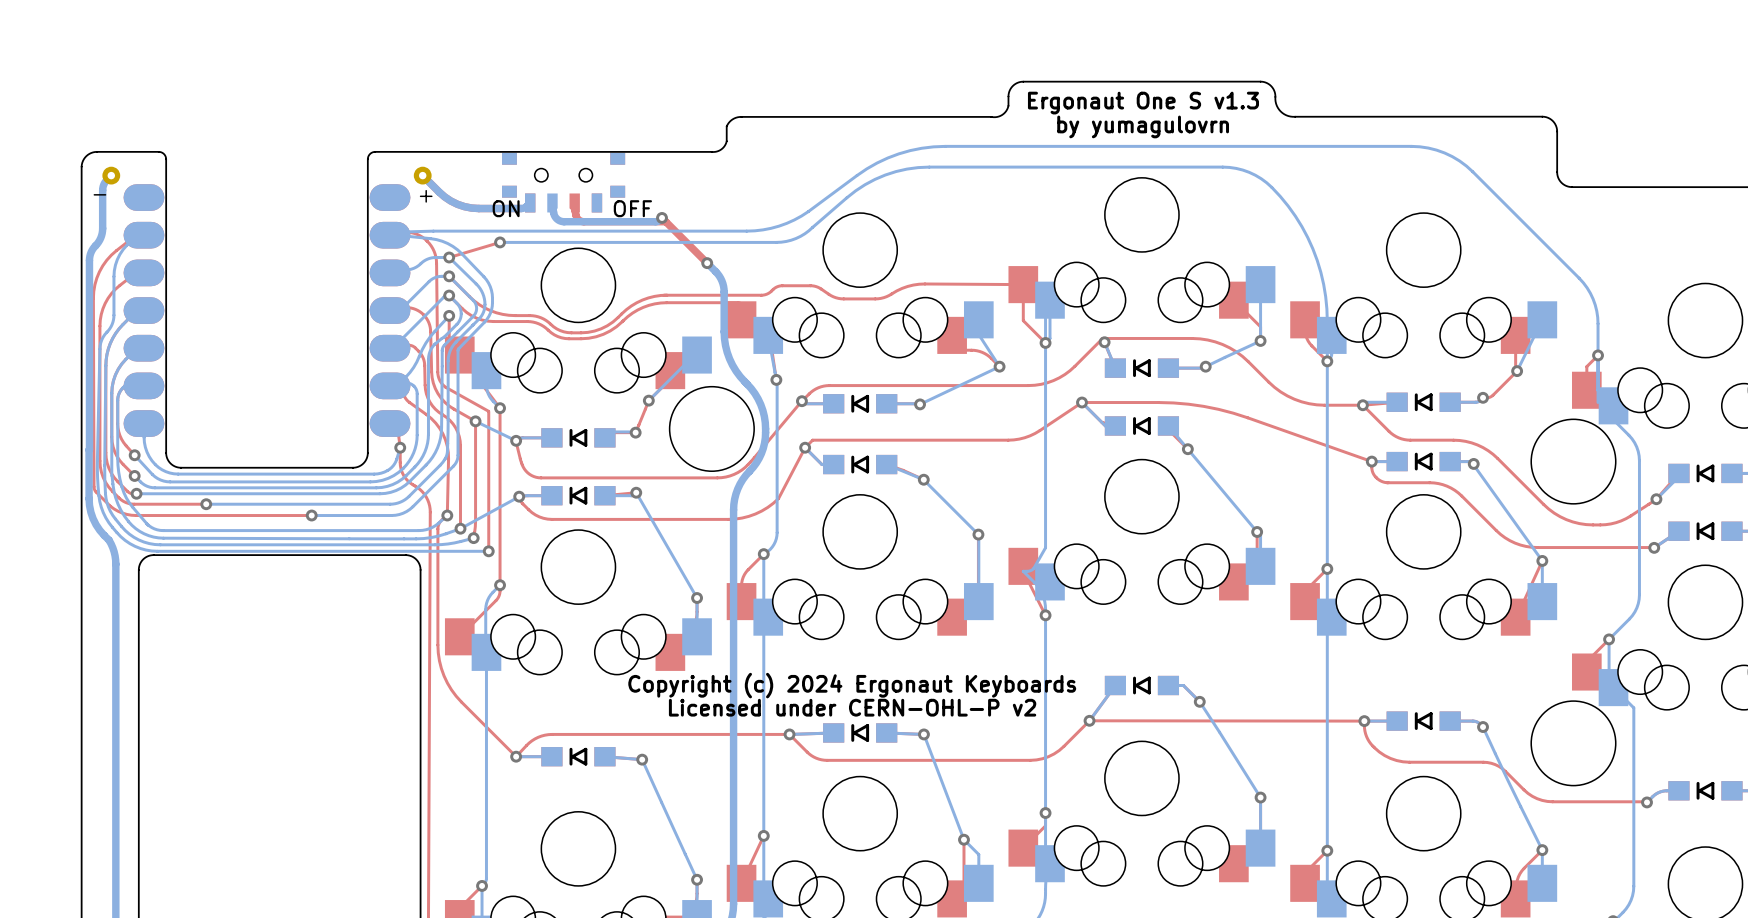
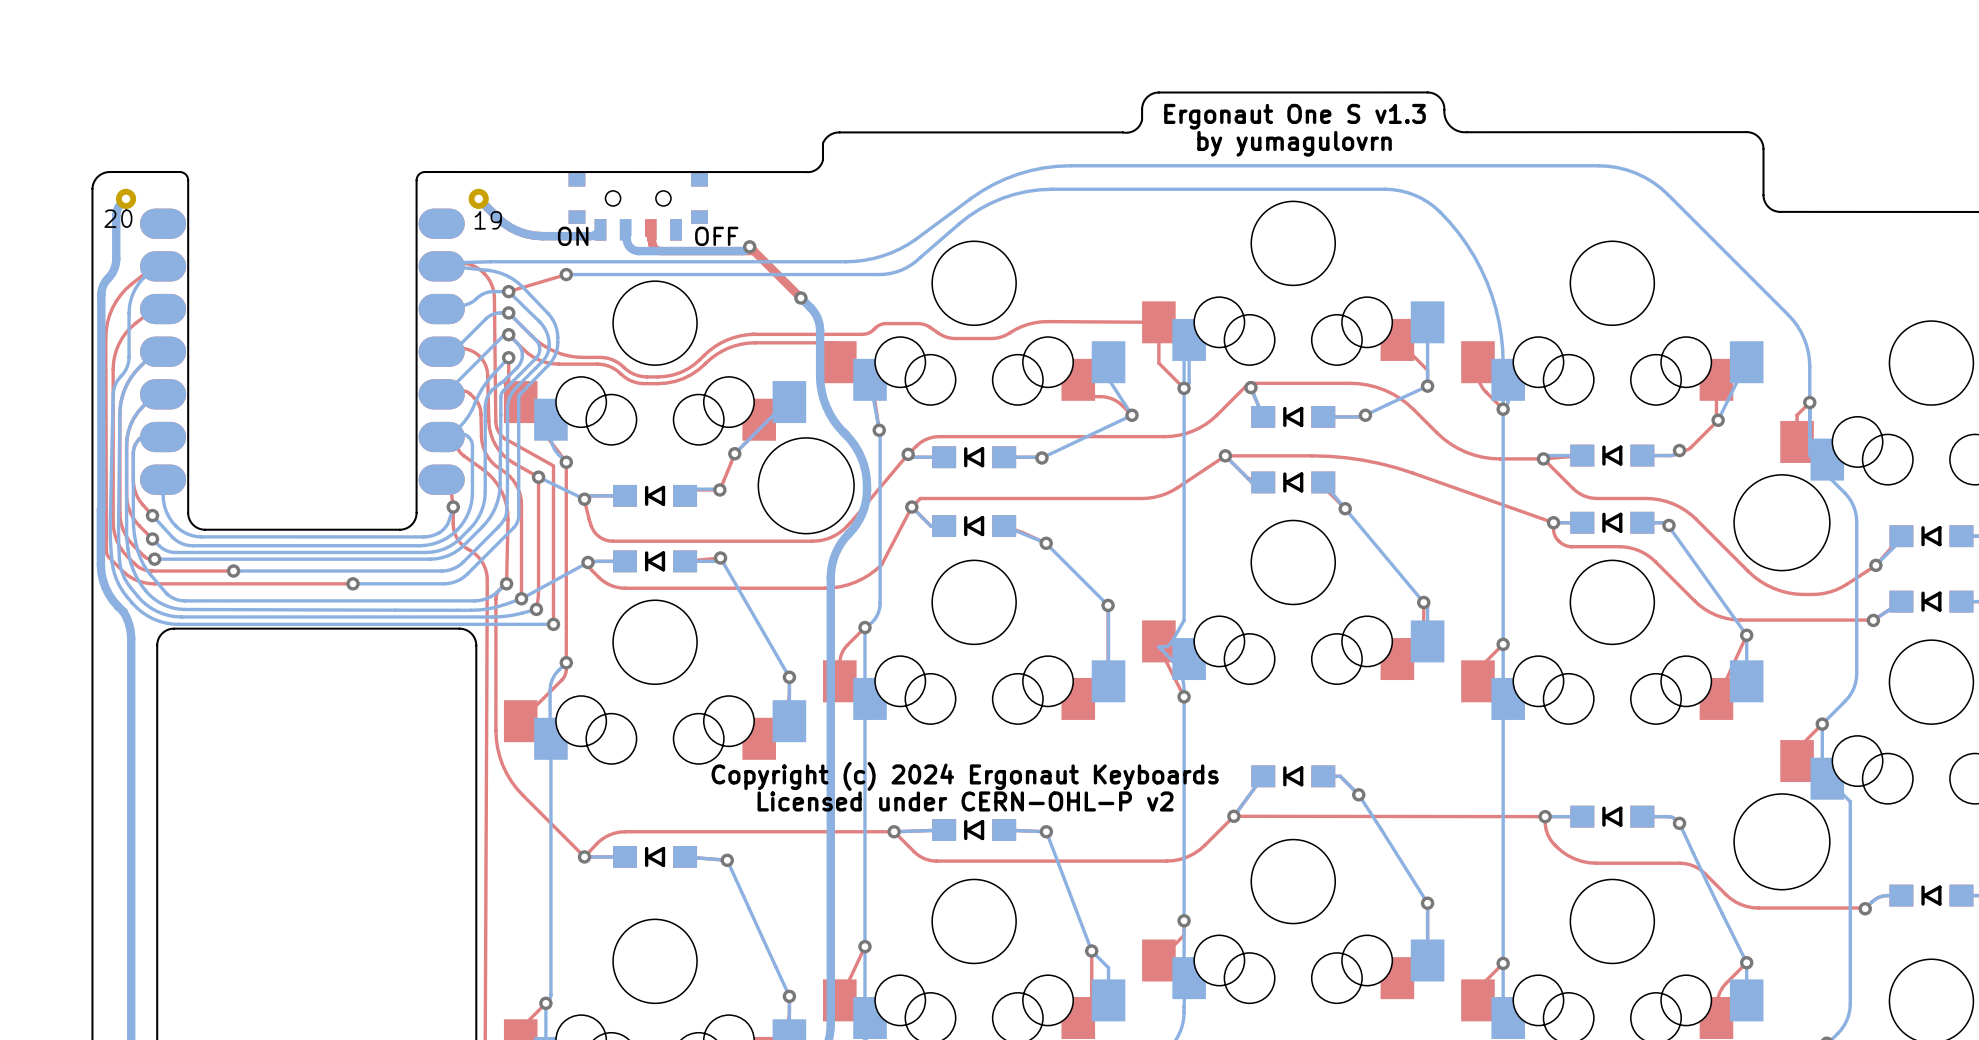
part text: - (99, 194) -> 20 (118, 218)
part text: + (426, 196) -> 19 (488, 220)

